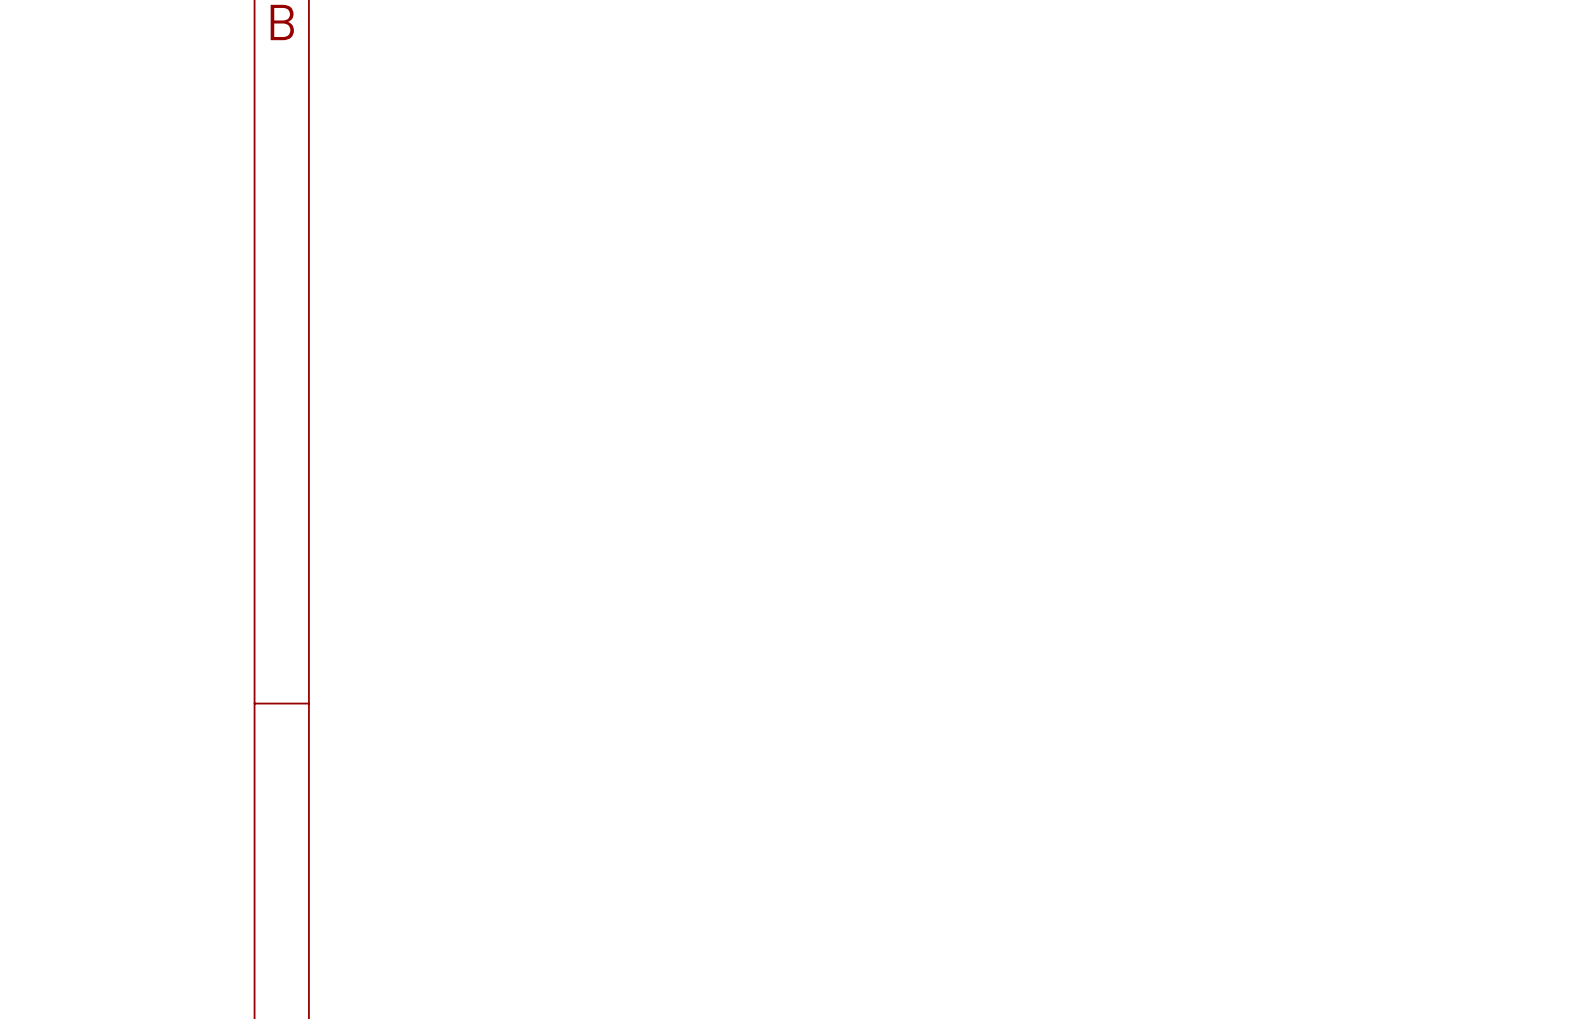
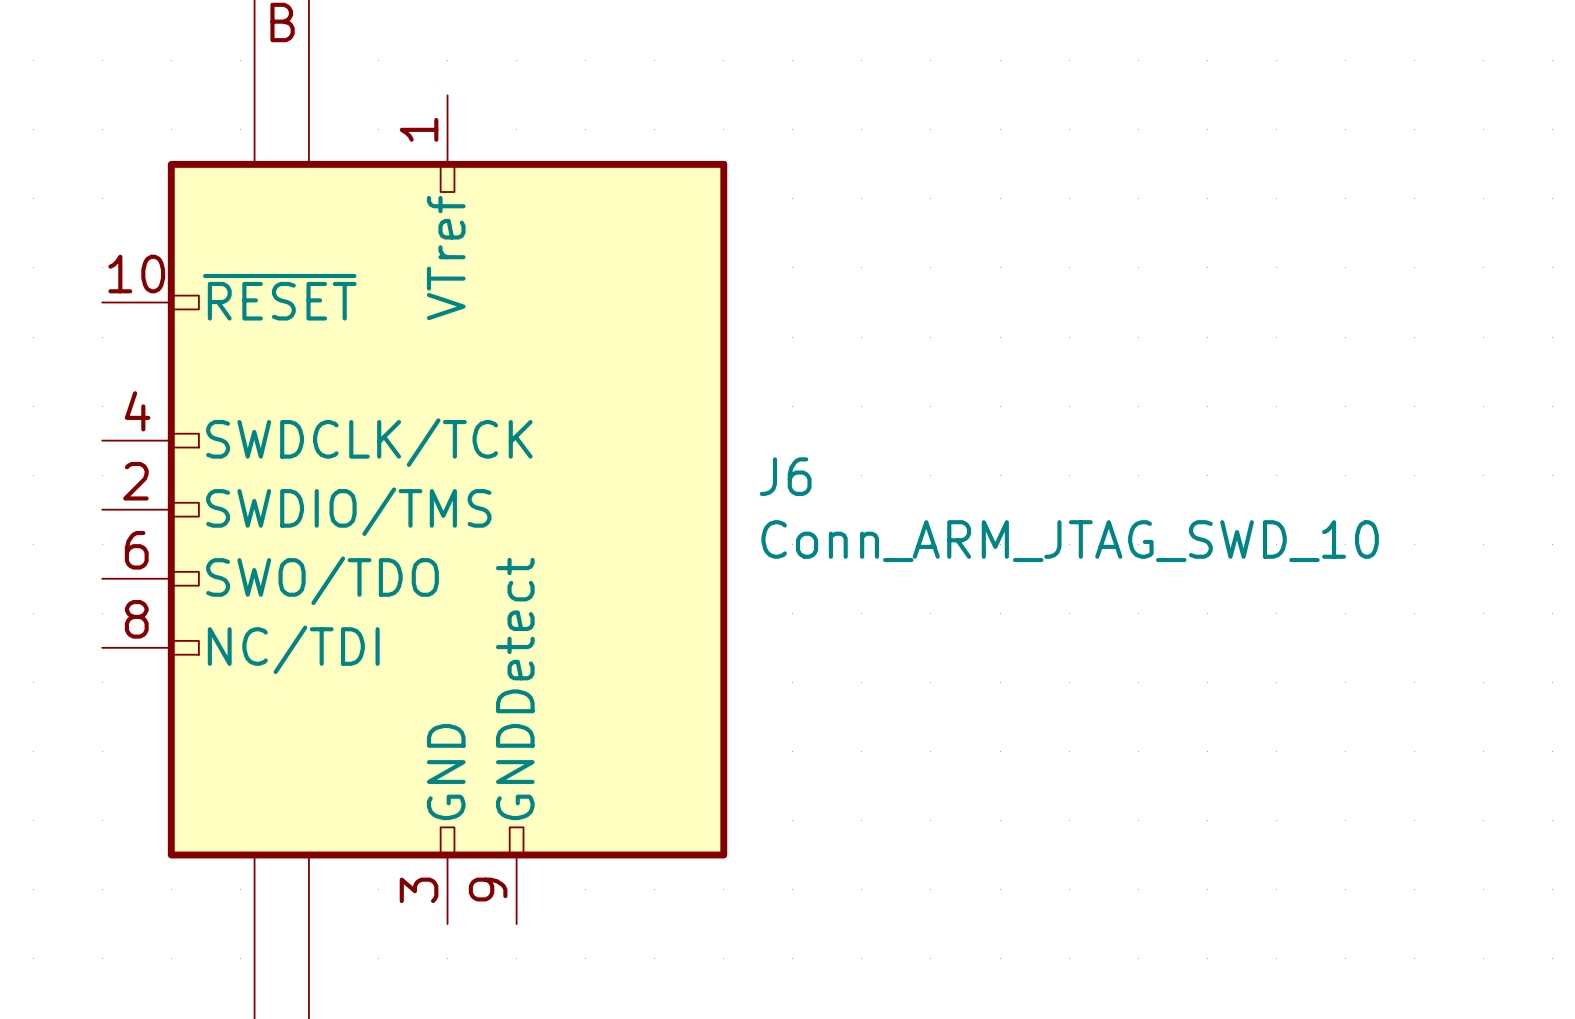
J6: none -> Conn_ARM_JTAG_SWD_10 (414, 509)

